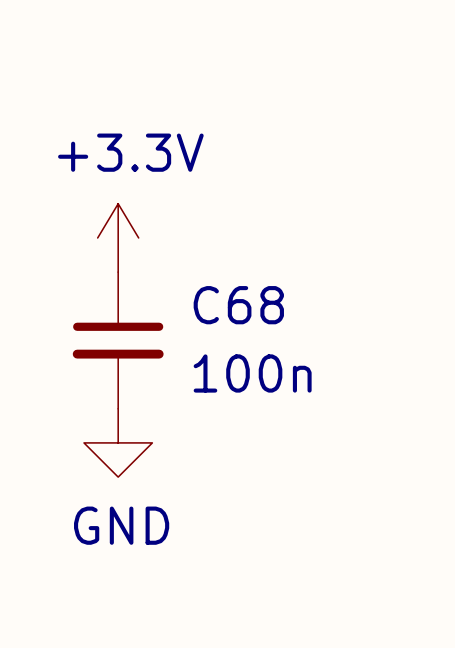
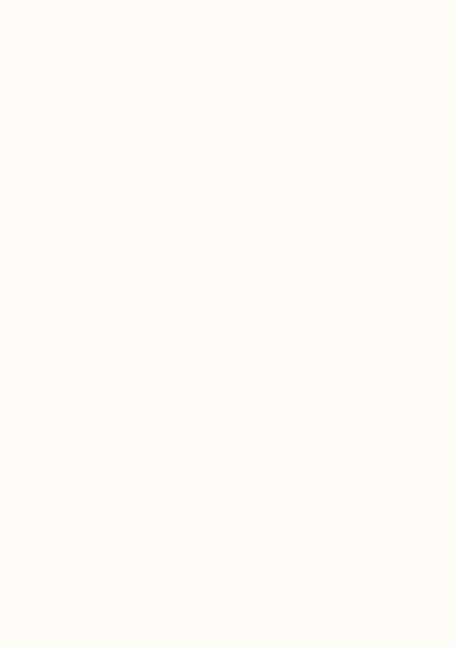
power symbol: +3.3V (118, 237) -> none
C68: 100n (118, 340) -> none
power symbol: GND (118, 442) -> none

